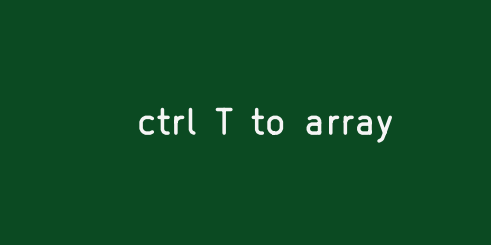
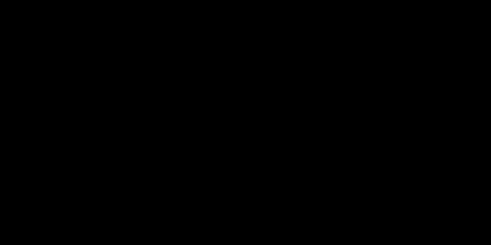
text: ctrl T to array (265, 125) -> none

